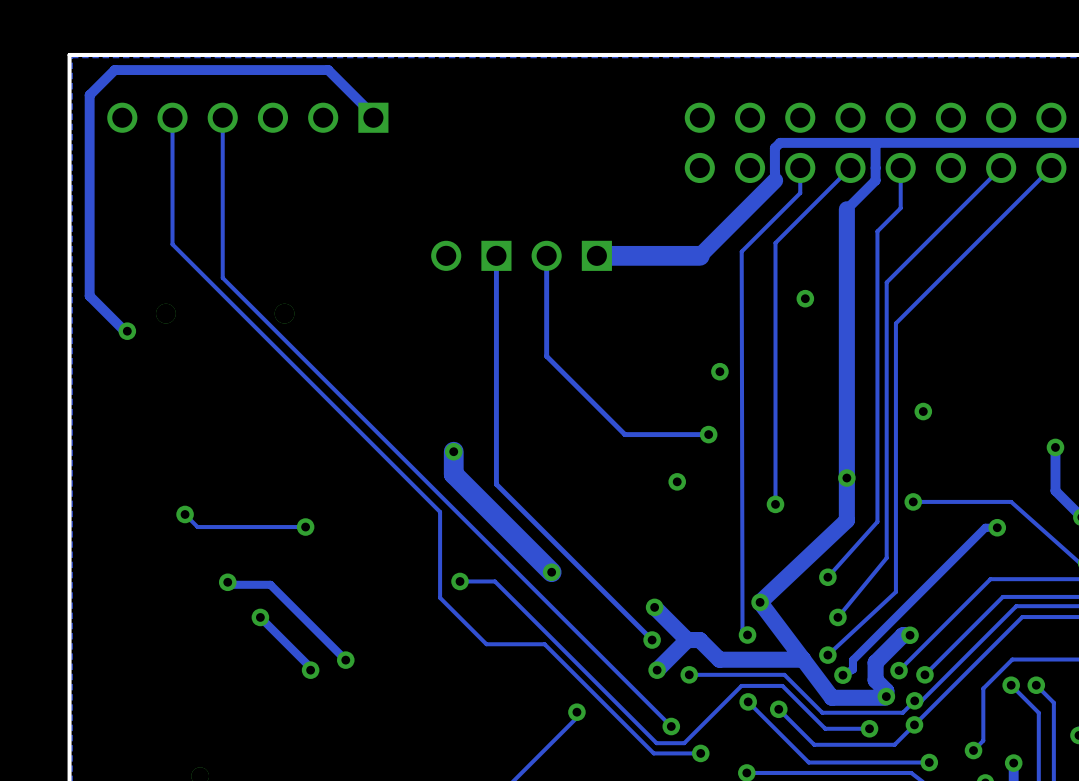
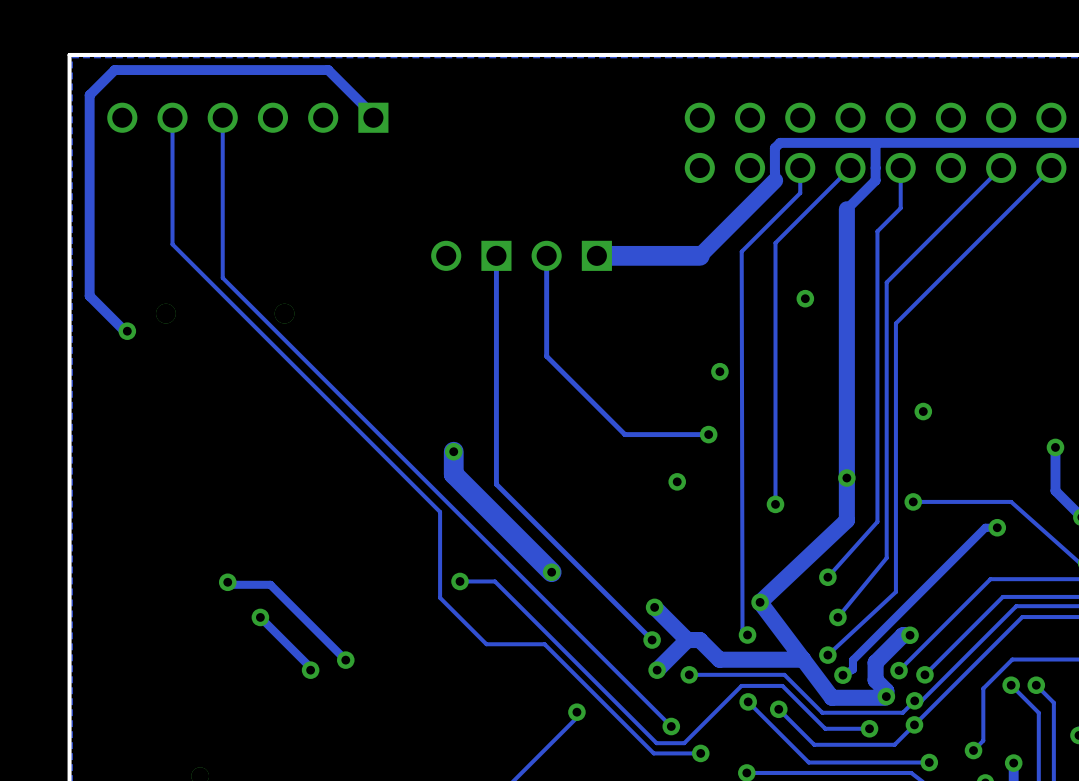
track: (185, 514) (197, 527) (305, 527) -> none
via: (185, 514) -> none
via: (305, 527) -> none

